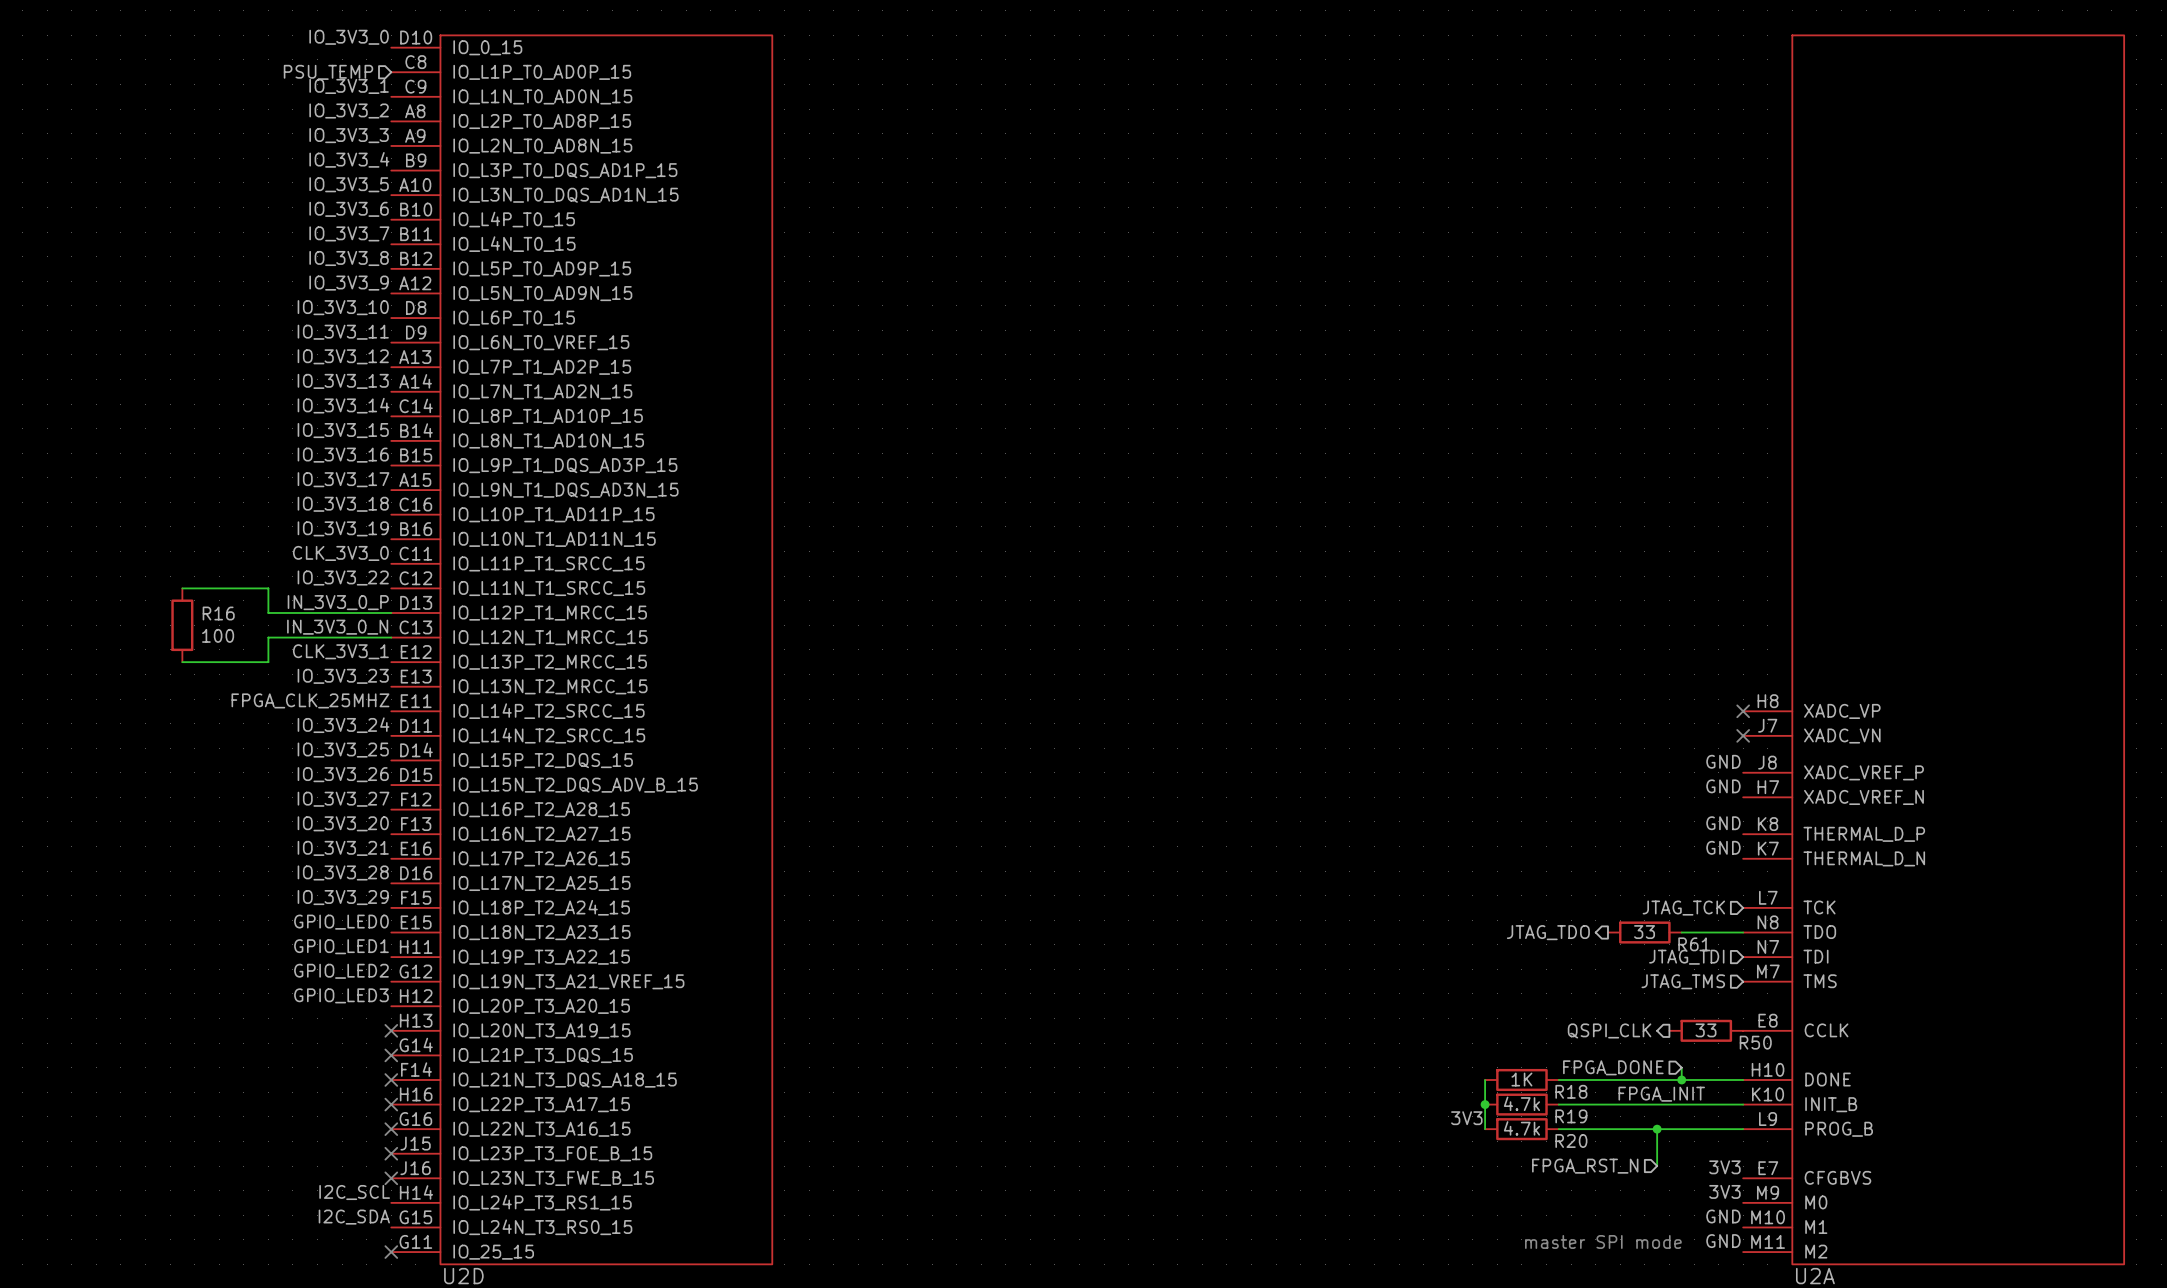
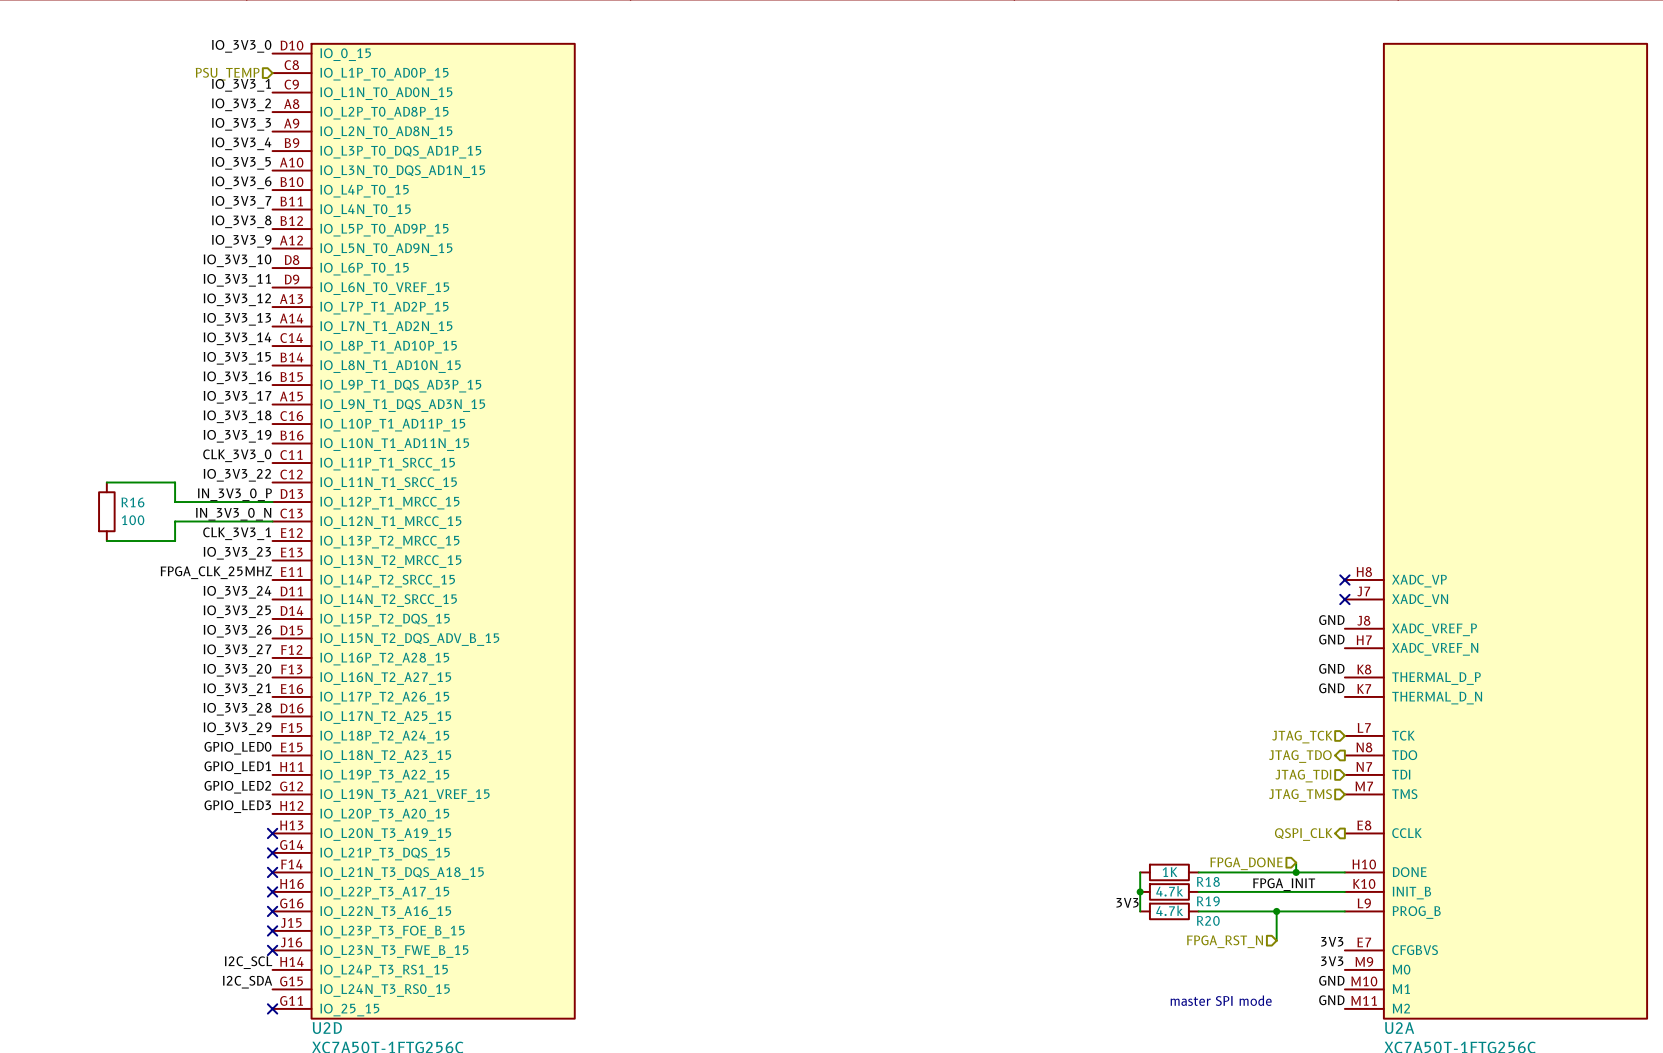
hierarchical label position: JTAG_TDO (1548, 932) -> JTAG_TDO (1300, 756)
R61: 33 (1644, 932) -> none
wire: (1681, 932) (1743, 932) -> none
hierarchical label position: QSPI_CLK (1609, 1030) -> QSPI_CLK (1303, 834)
R50: 33 (1706, 1030) -> none

